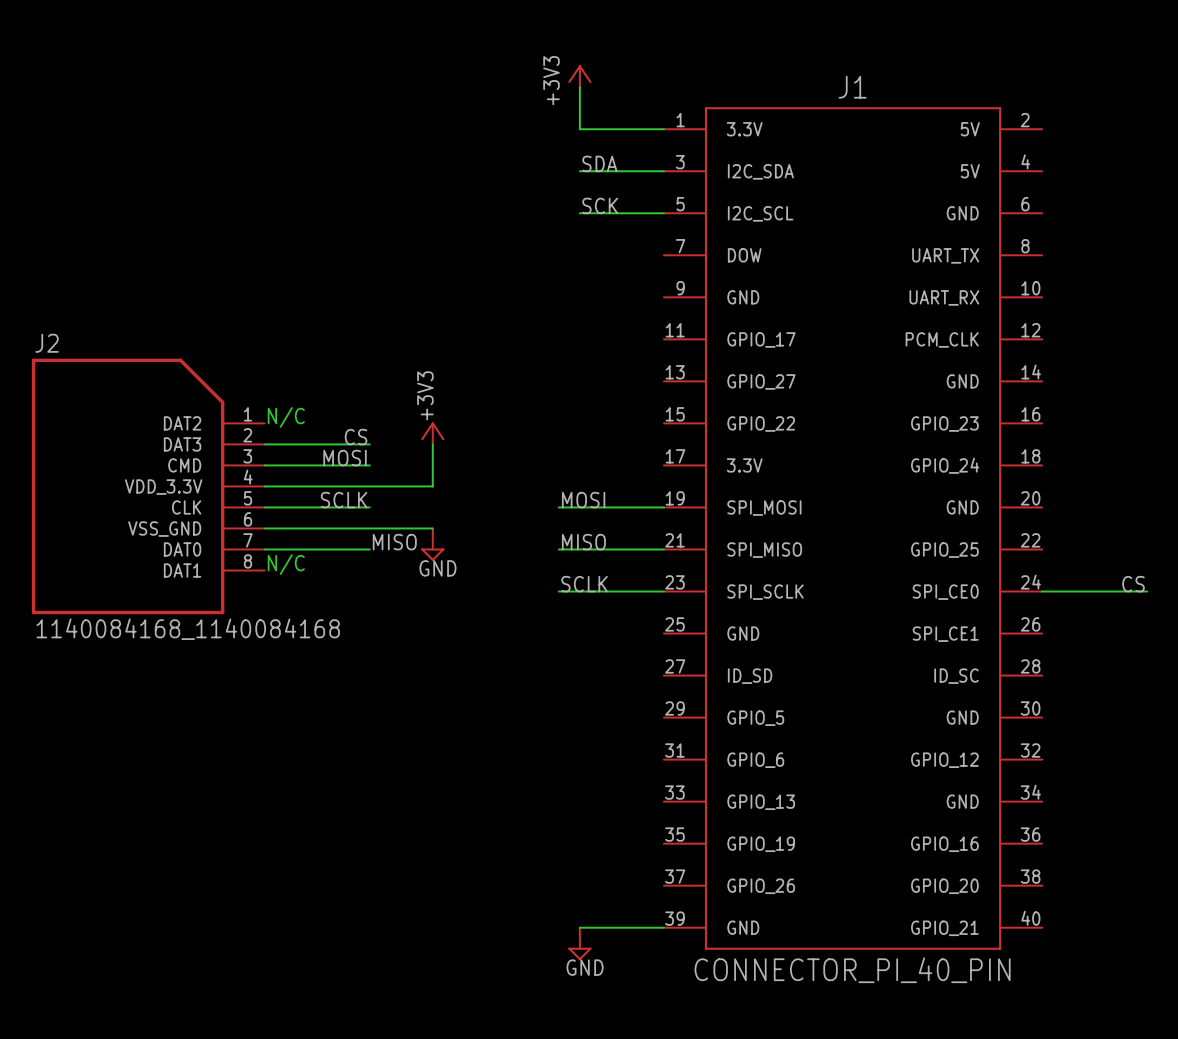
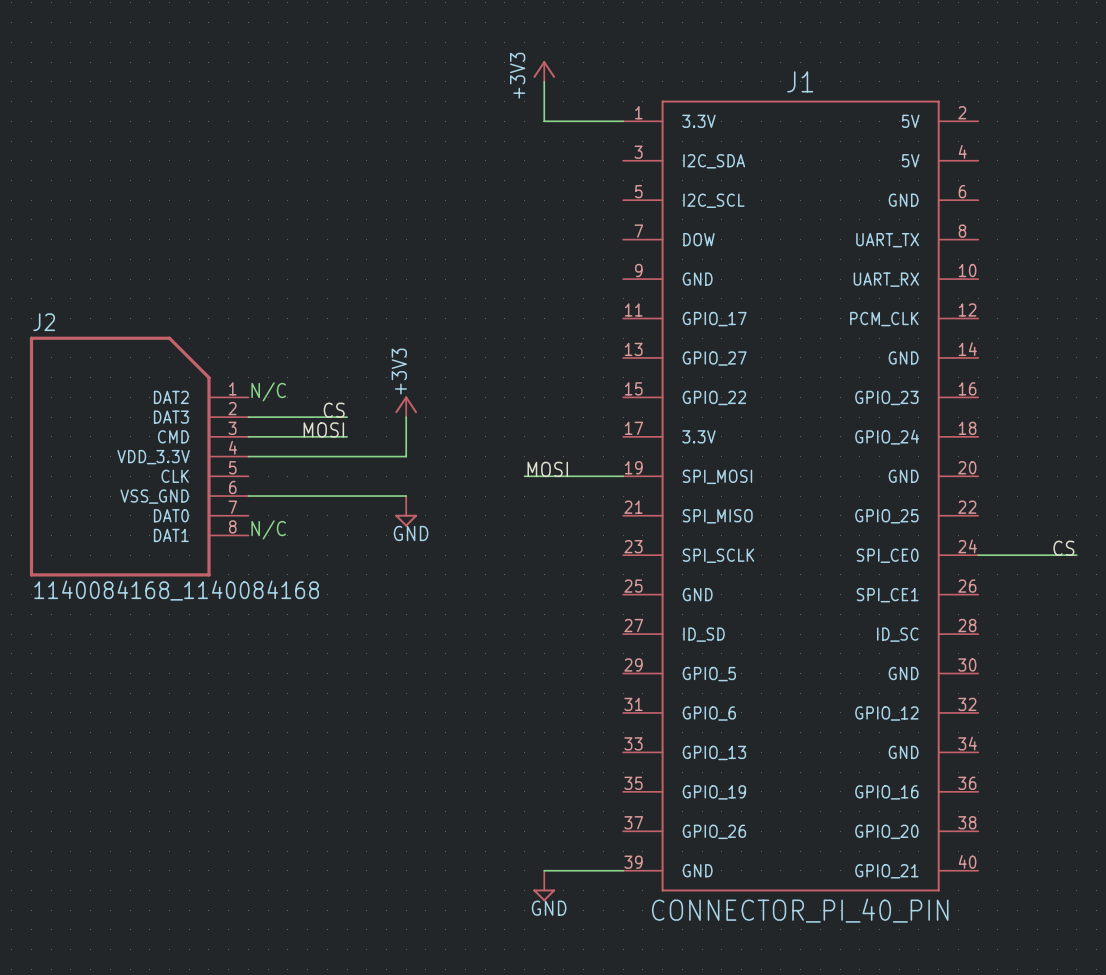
label: SDA (599, 163) -> none
wire: (579, 171) (663, 171) -> none
label: SCK (600, 205) -> none
wire: (579, 213) (663, 213) -> none
label: SCLK (344, 500) -> none
wire: (264, 507) (369, 507) -> none
label: MISO (394, 542) -> none
label: MISO (583, 542) -> none
wire: (264, 549) (369, 549) -> none
wire: (558, 549) (663, 549) -> none
label: SCLK (584, 584) -> none
wire: (558, 591) (663, 591) -> none

